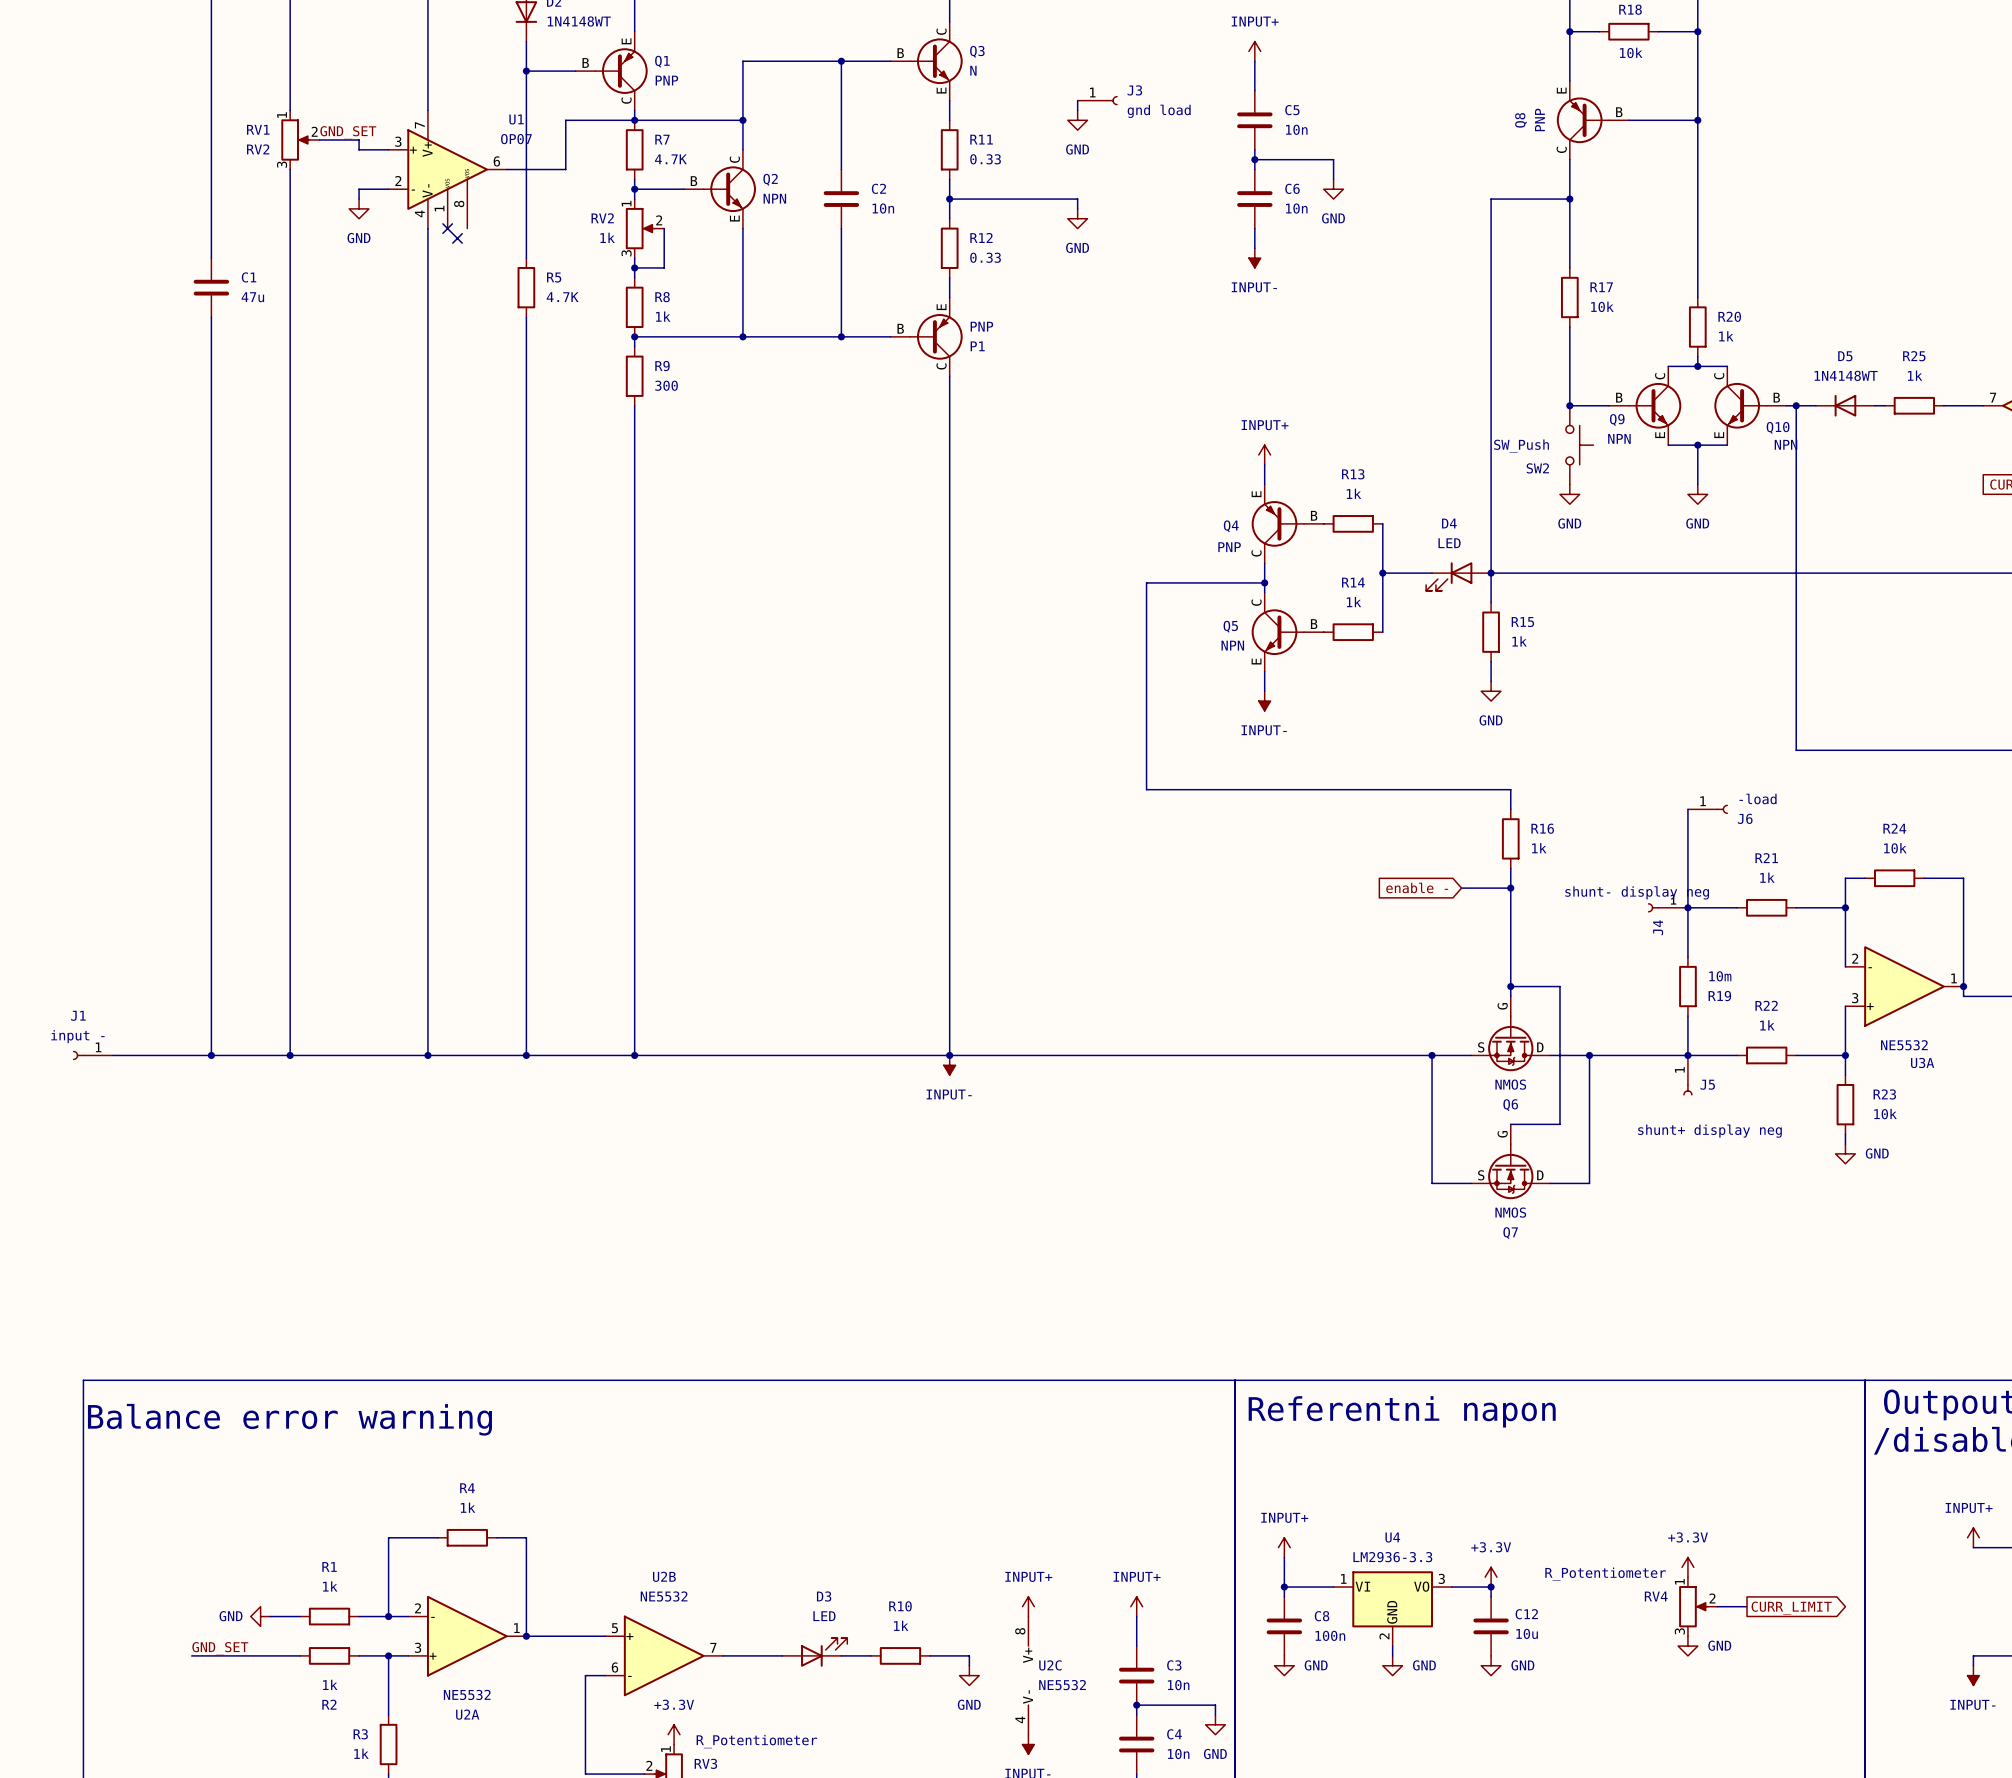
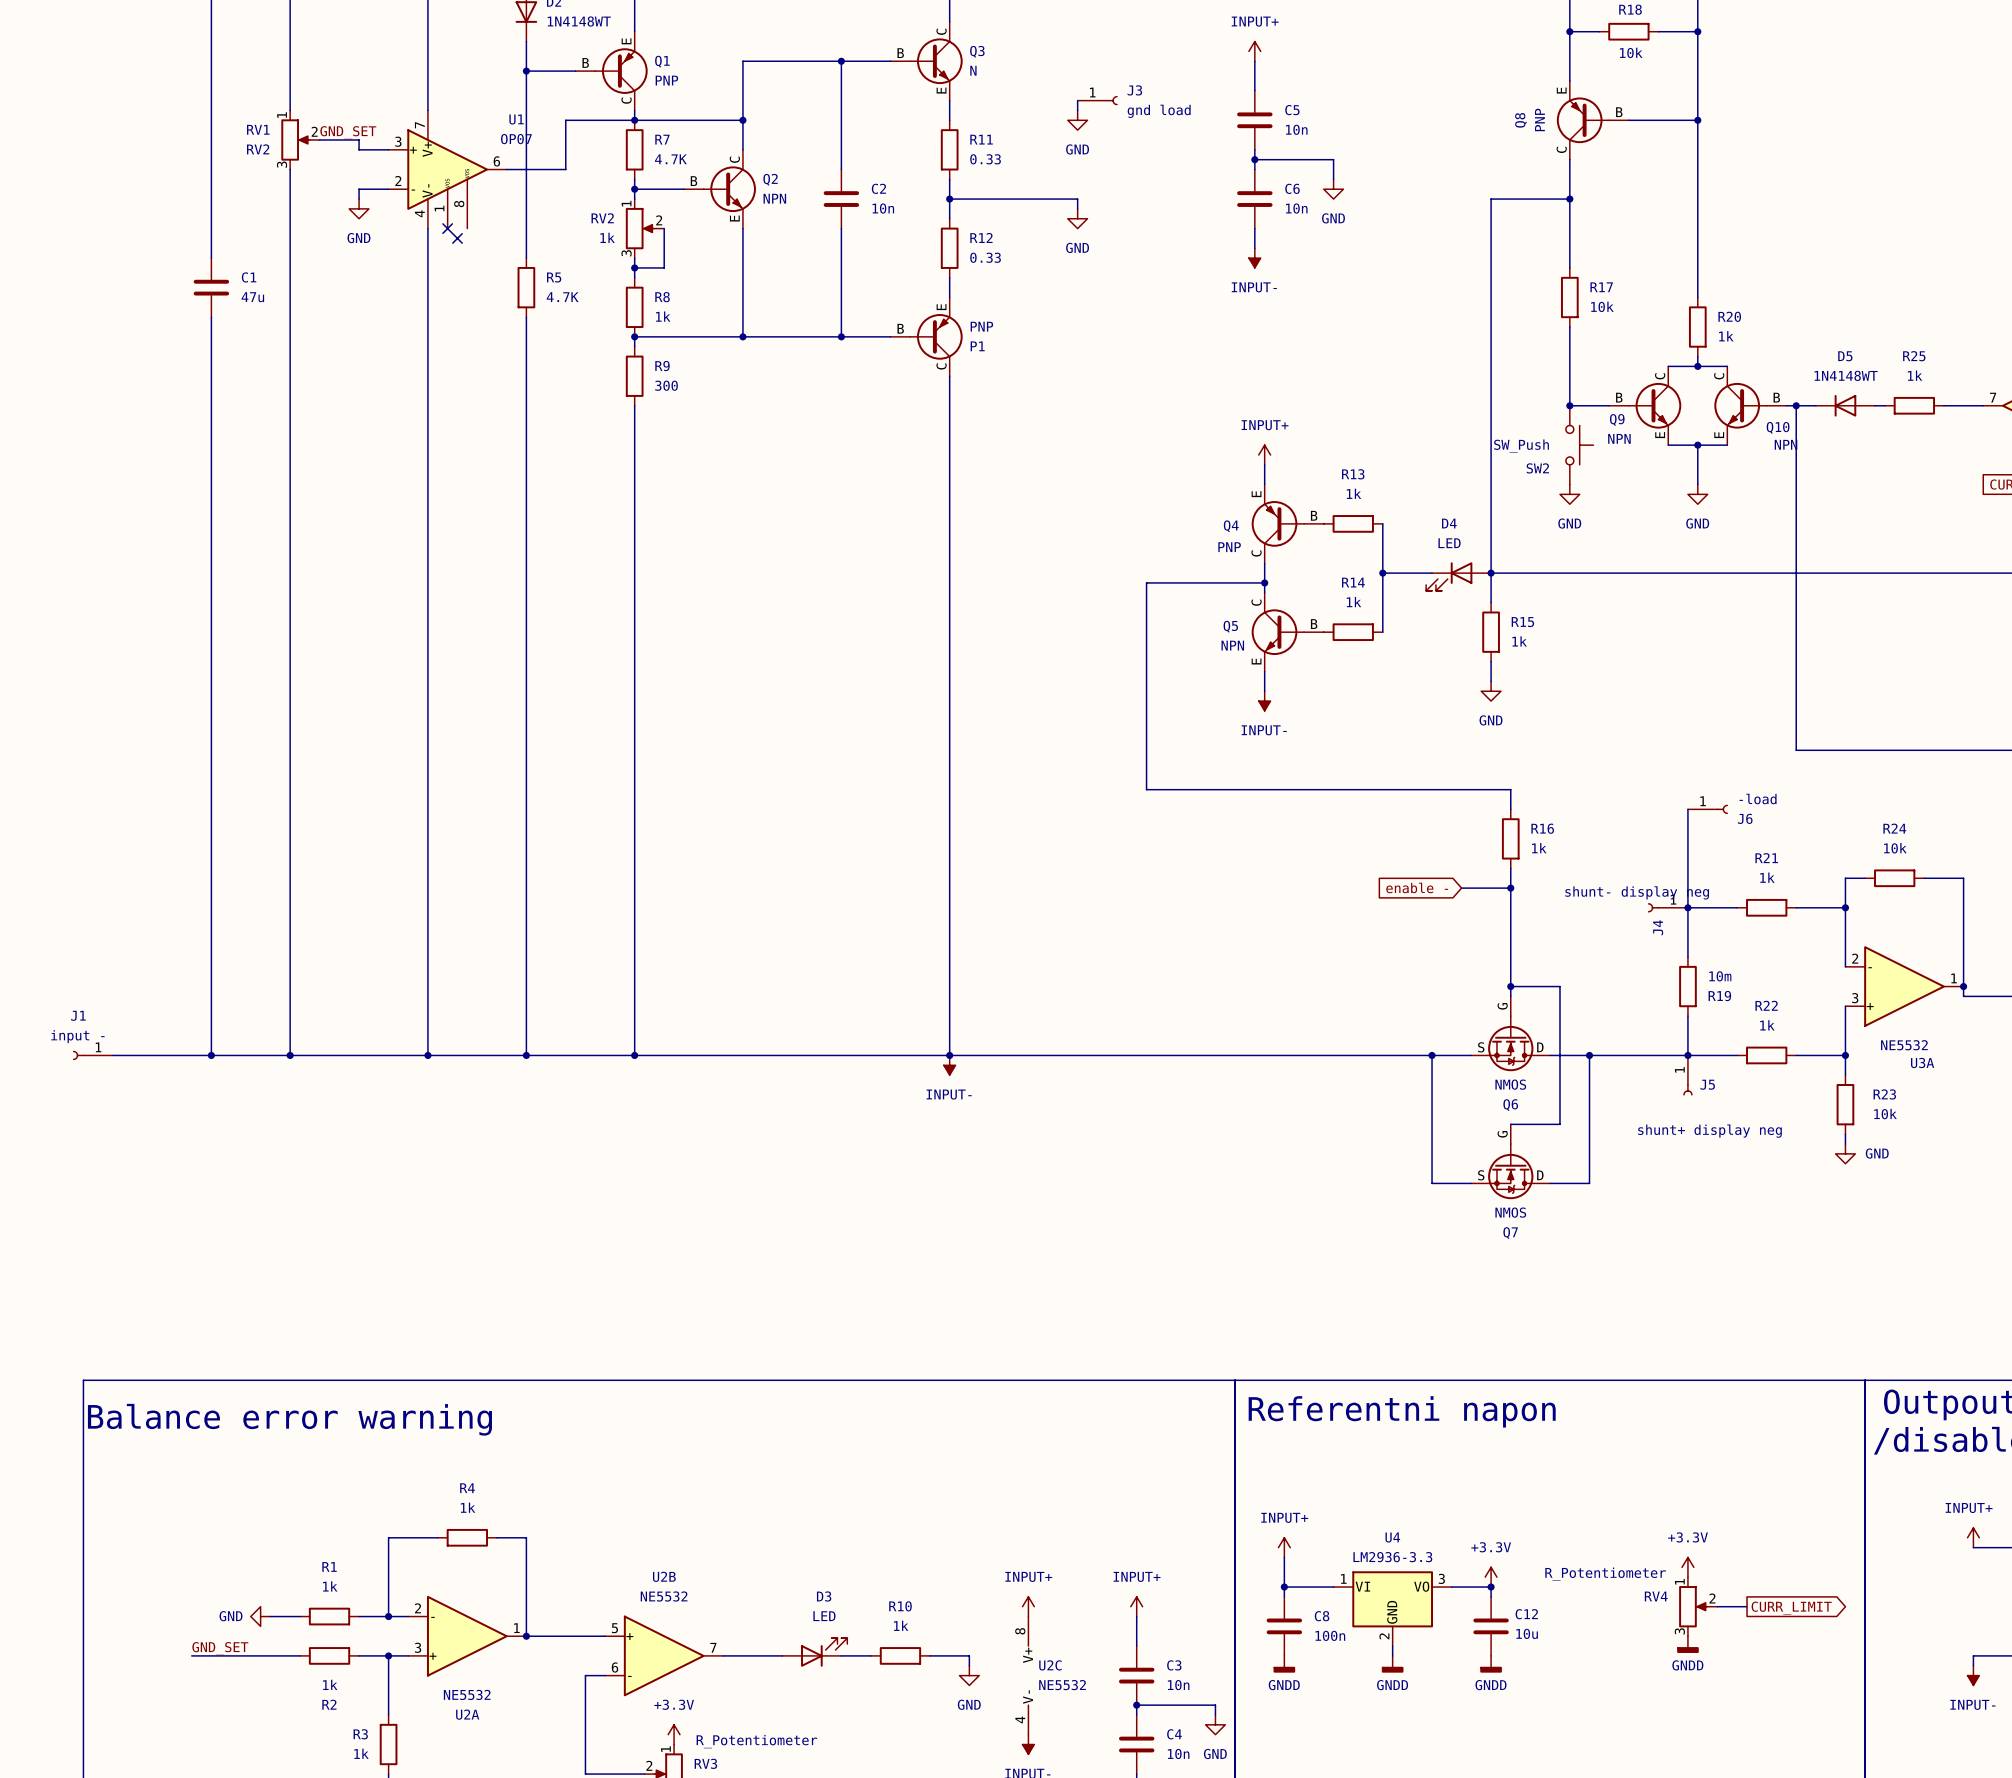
power symbol: GND (1687, 1646) -> GNDD (1687, 1644)
power symbol: GND (1284, 1665) -> GNDD (1284, 1664)
power symbol: GND (1392, 1665) -> GNDD (1392, 1664)
power symbol: GND (1491, 1665) -> GNDD (1491, 1664)

